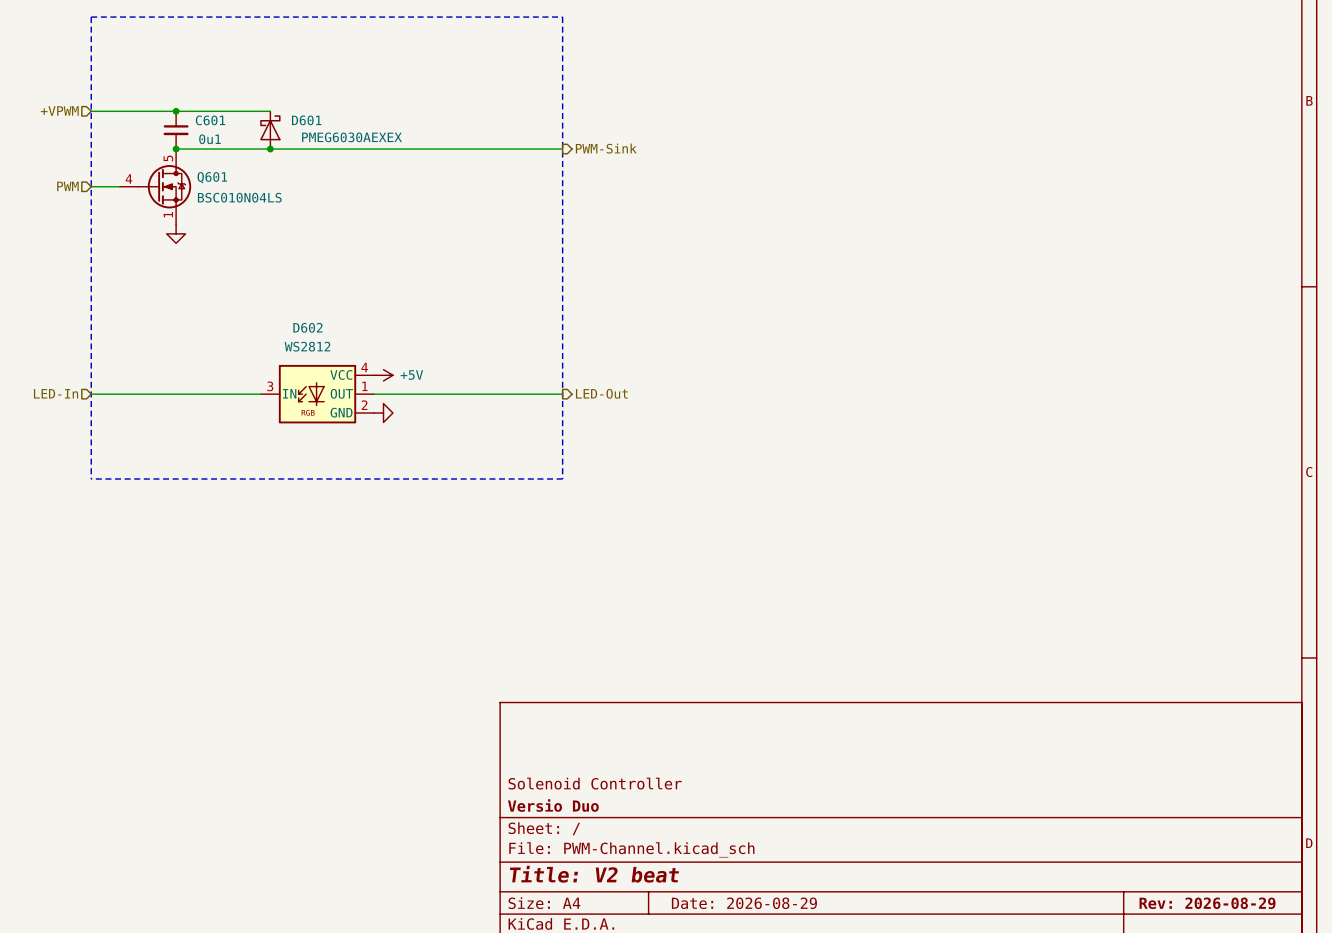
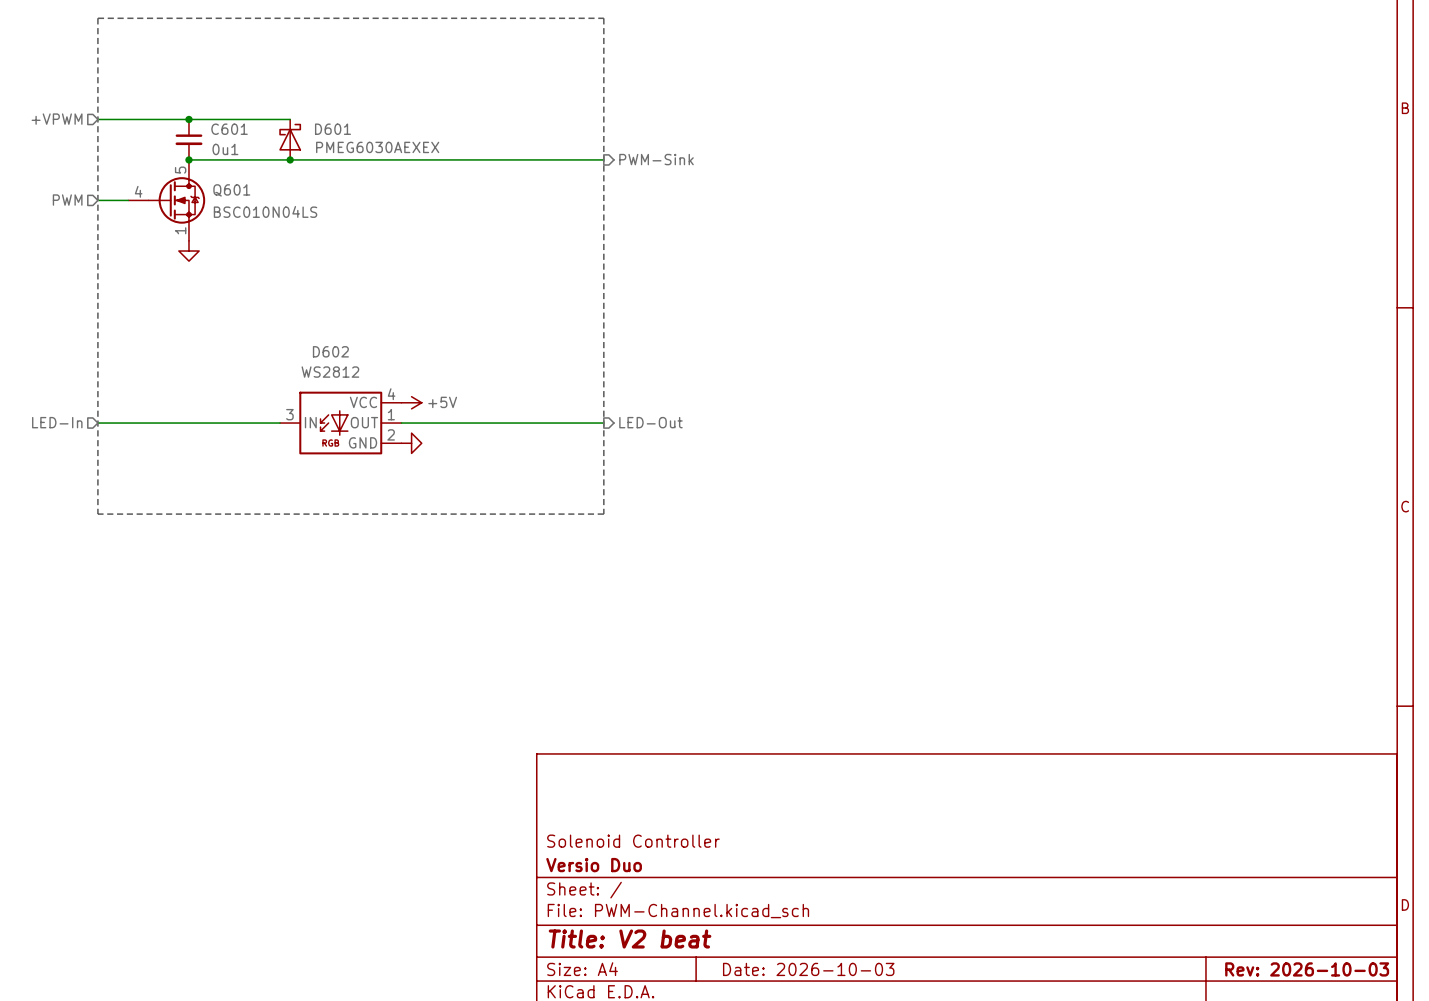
title block: Date: 2026-08-29 (744, 903) -> Date: 2026-10-03 (808, 969)
title block: Rev: 2026-08-29 (1207, 903) -> Rev: 2026-10-03 (1307, 969)

